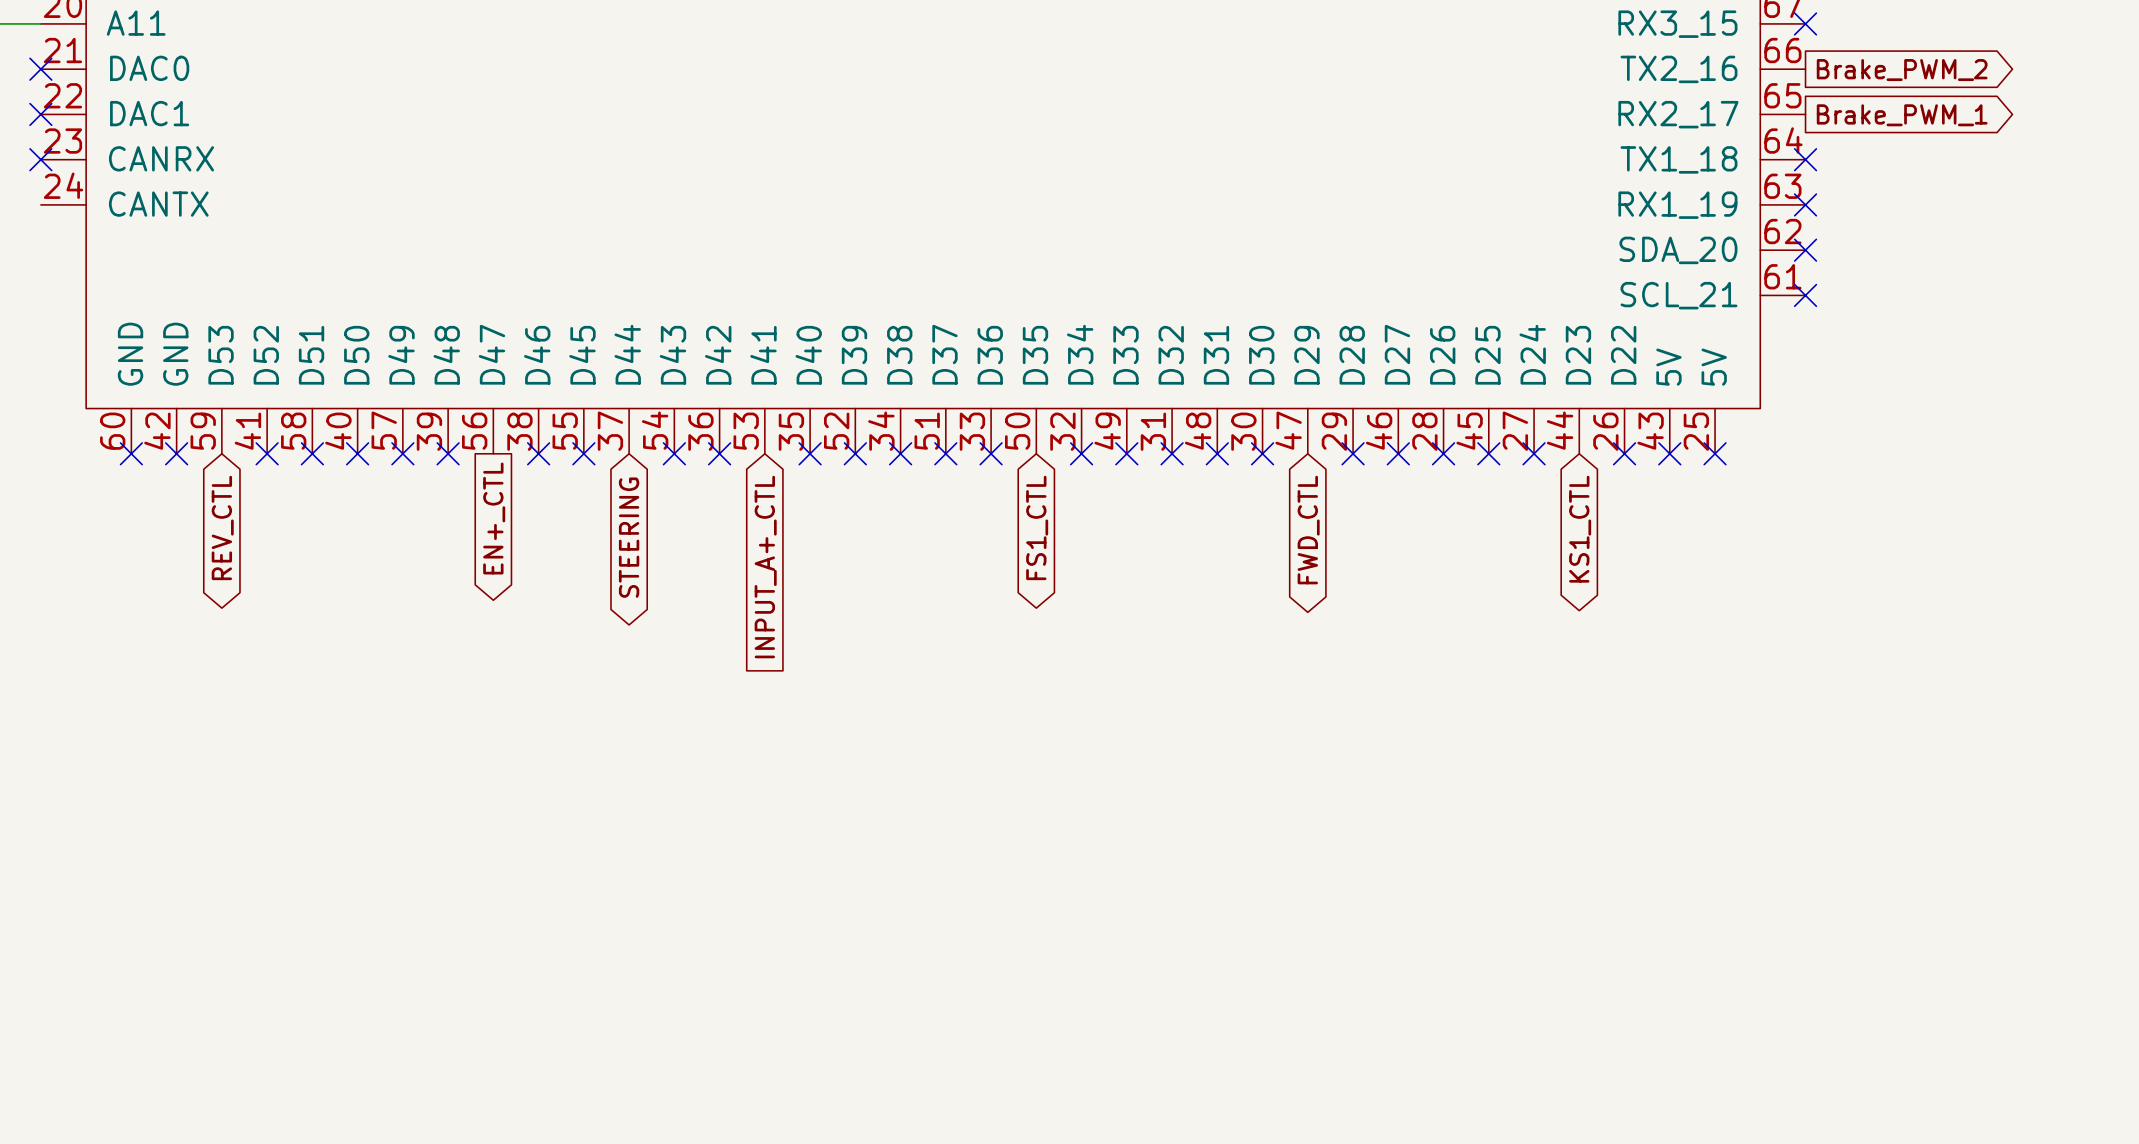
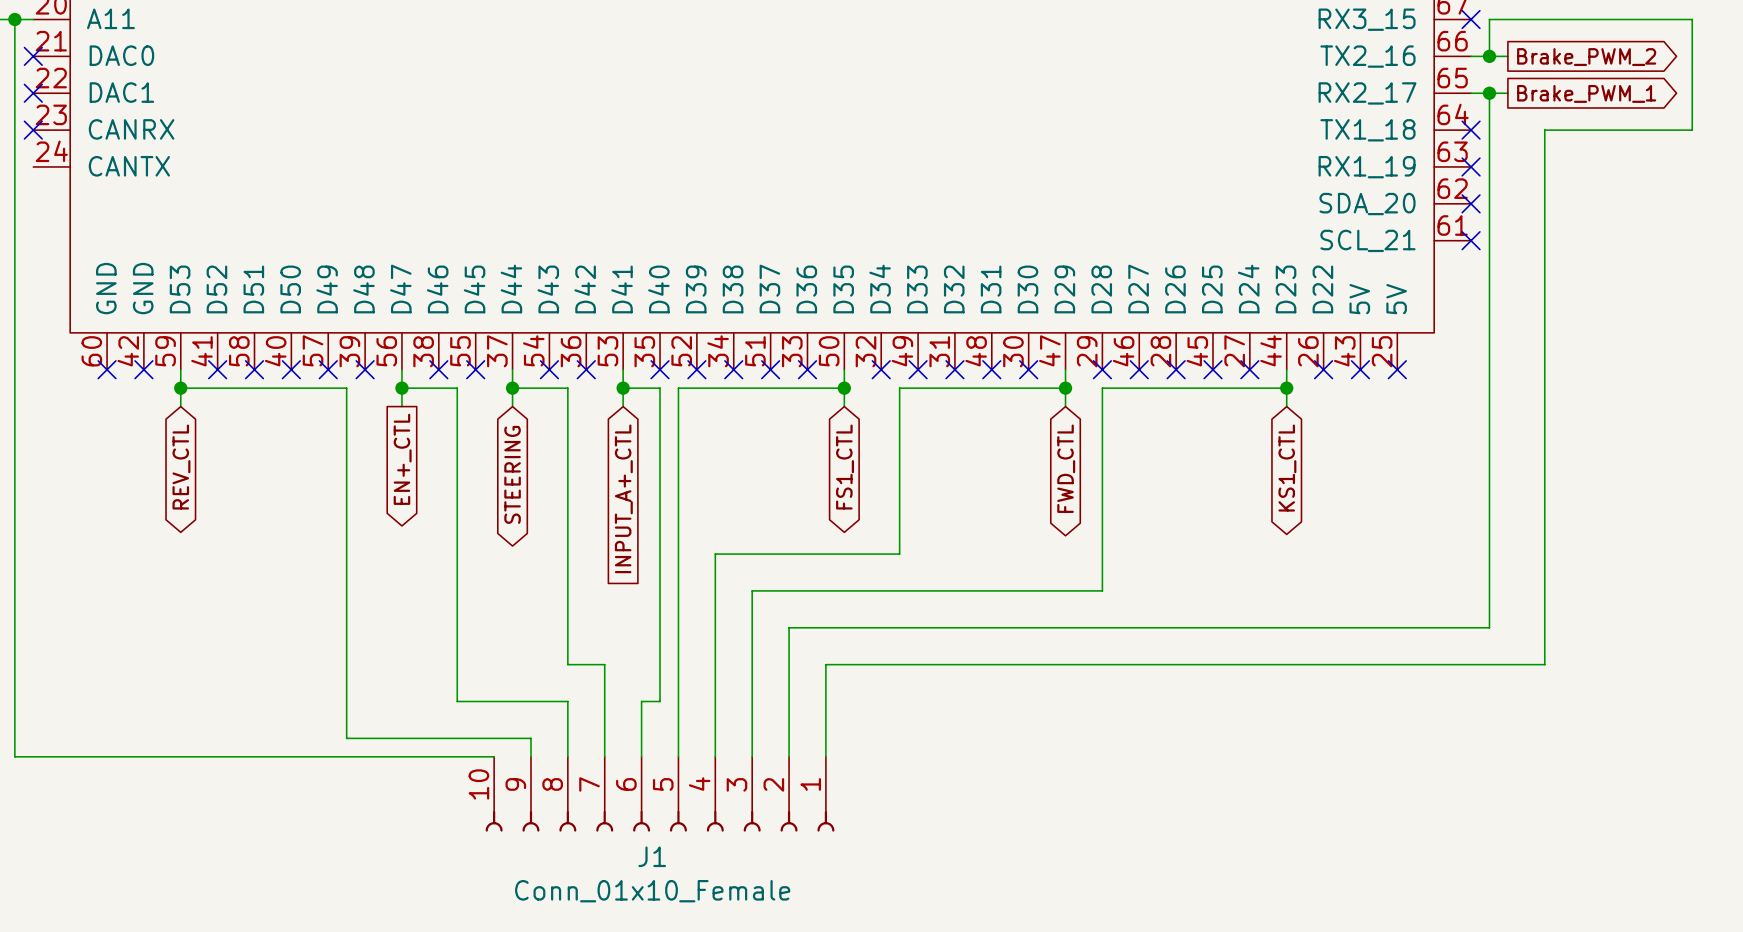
wire: none -> (14, 19) (14, 756) (494, 756)
junction: none -> (14, 19)
wire: none -> (1471, 56) (1507, 56)
wire: none -> (1489, 56) (1489, 19) (1692, 19) (1692, 130) (1544, 130) (1544, 664) (825, 664) (825, 756)
junction: none -> (1489, 56)
global label position: Brake_PWM_2 (1902, 70) -> Brake_PWM_2 (1586, 57)
wire: none -> (1471, 93) (1507, 93)
wire: none -> (1489, 93) (1489, 627) (789, 627) (789, 756)
junction: none -> (1489, 93)
global label position: Brake_PWM_1 (1902, 115) -> Brake_PWM_1 (1586, 93)
wire: none -> (180, 369) (180, 406)
wire: none -> (401, 369) (401, 406)
wire: none -> (512, 369) (512, 406)
wire: none -> (623, 369) (623, 406)
wire: none -> (844, 369) (844, 406)
wire: none -> (1065, 369) (1065, 406)
wire: none -> (1286, 369) (1286, 406)
wire: none -> (180, 388) (346, 388) (346, 738) (530, 738) (530, 756)
junction: none -> (180, 388)
wire: none -> (401, 388) (457, 388) (457, 701) (567, 701) (567, 756)
junction: none -> (401, 388)
wire: none -> (512, 388) (567, 388) (567, 664) (604, 664) (604, 756)
junction: none -> (512, 388)
wire: none -> (623, 388) (660, 388) (660, 701) (641, 701) (641, 756)
junction: none -> (623, 388)
wire: none -> (844, 388) (678, 388) (678, 756)
junction: none -> (844, 388)
wire: none -> (1065, 388) (899, 388) (899, 554) (715, 554) (715, 756)
junction: none -> (1065, 388)
wire: none -> (1286, 388) (1102, 388) (1102, 590) (752, 590) (752, 756)
junction: none -> (1286, 388)
global label position: EN+_CTL (494, 518) -> EN+_CTL (402, 459)
global label position: REV_CTL (222, 527) -> REV_CTL (181, 467)
global label position: FS1_CTL (1037, 527) -> FS1_CTL (845, 467)
global label position: KS1_CTL (1580, 529) -> KS1_CTL (1287, 468)
global label position: FWD_CTL (1308, 530) -> FWD_CTL (1066, 468)
global label position: STEERING (629, 537) -> STEERING (512, 474)
global label position: INPUT_A+_CTL (765, 567) -> INPUT_A+_CTL (623, 498)
J1: none -> Conn_01x10_Female (660, 794)

